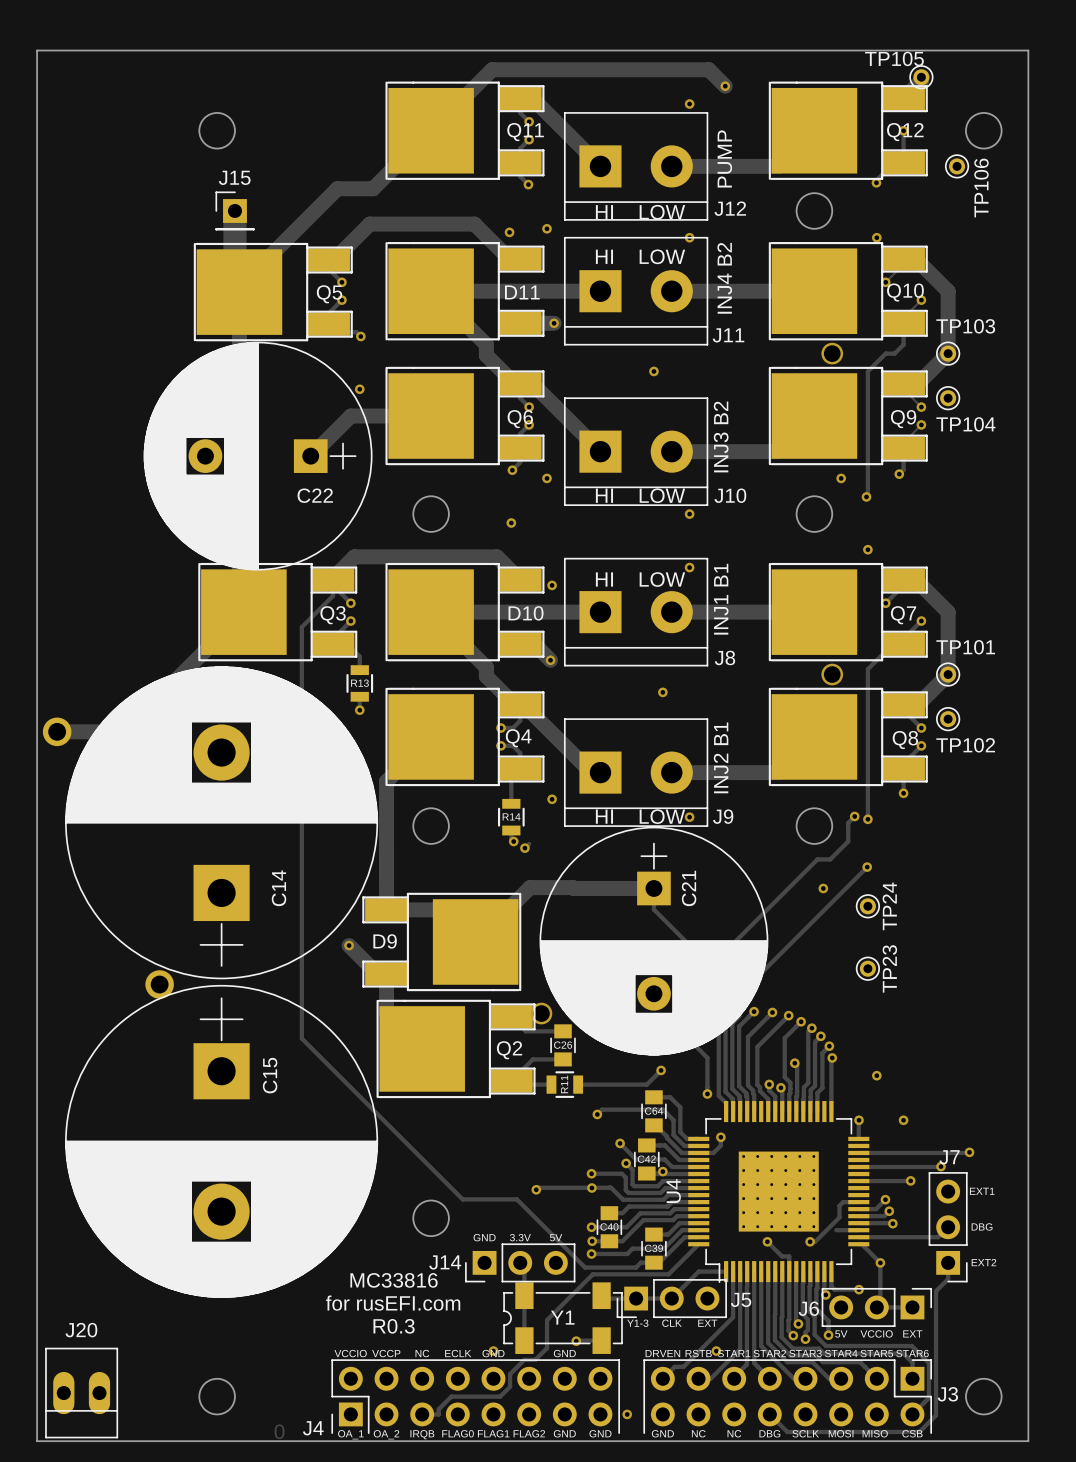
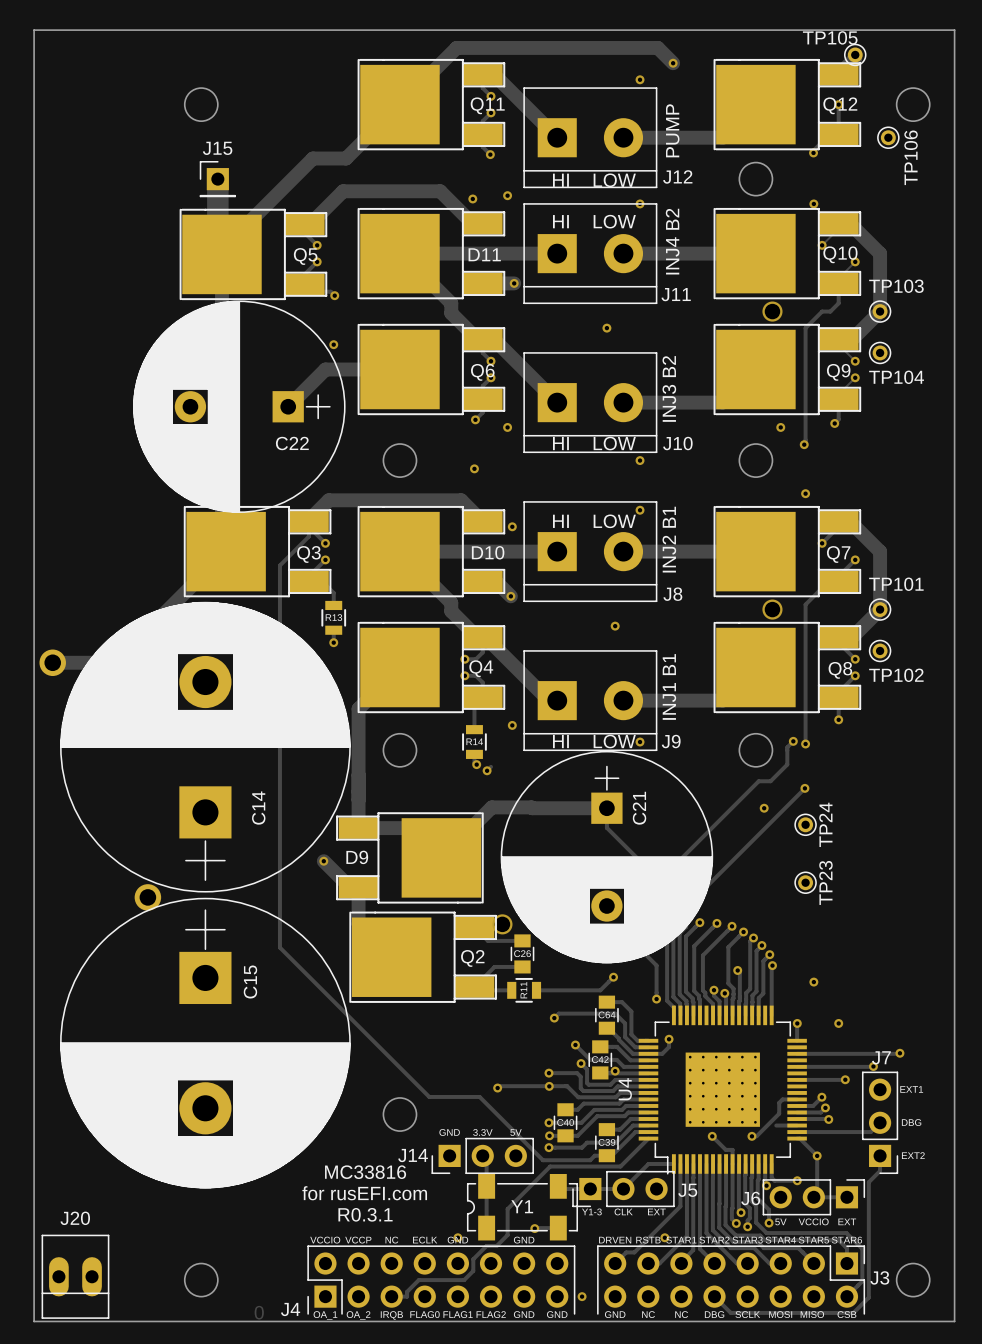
text: INJ1 B1 (721, 599) -> INJ2 B1 (669, 539)
text: INJ2 B1 (721, 757) -> INJ1 B1 (669, 686)
text: R0.3 (394, 1326) -> R0.3.1 (365, 1214)

